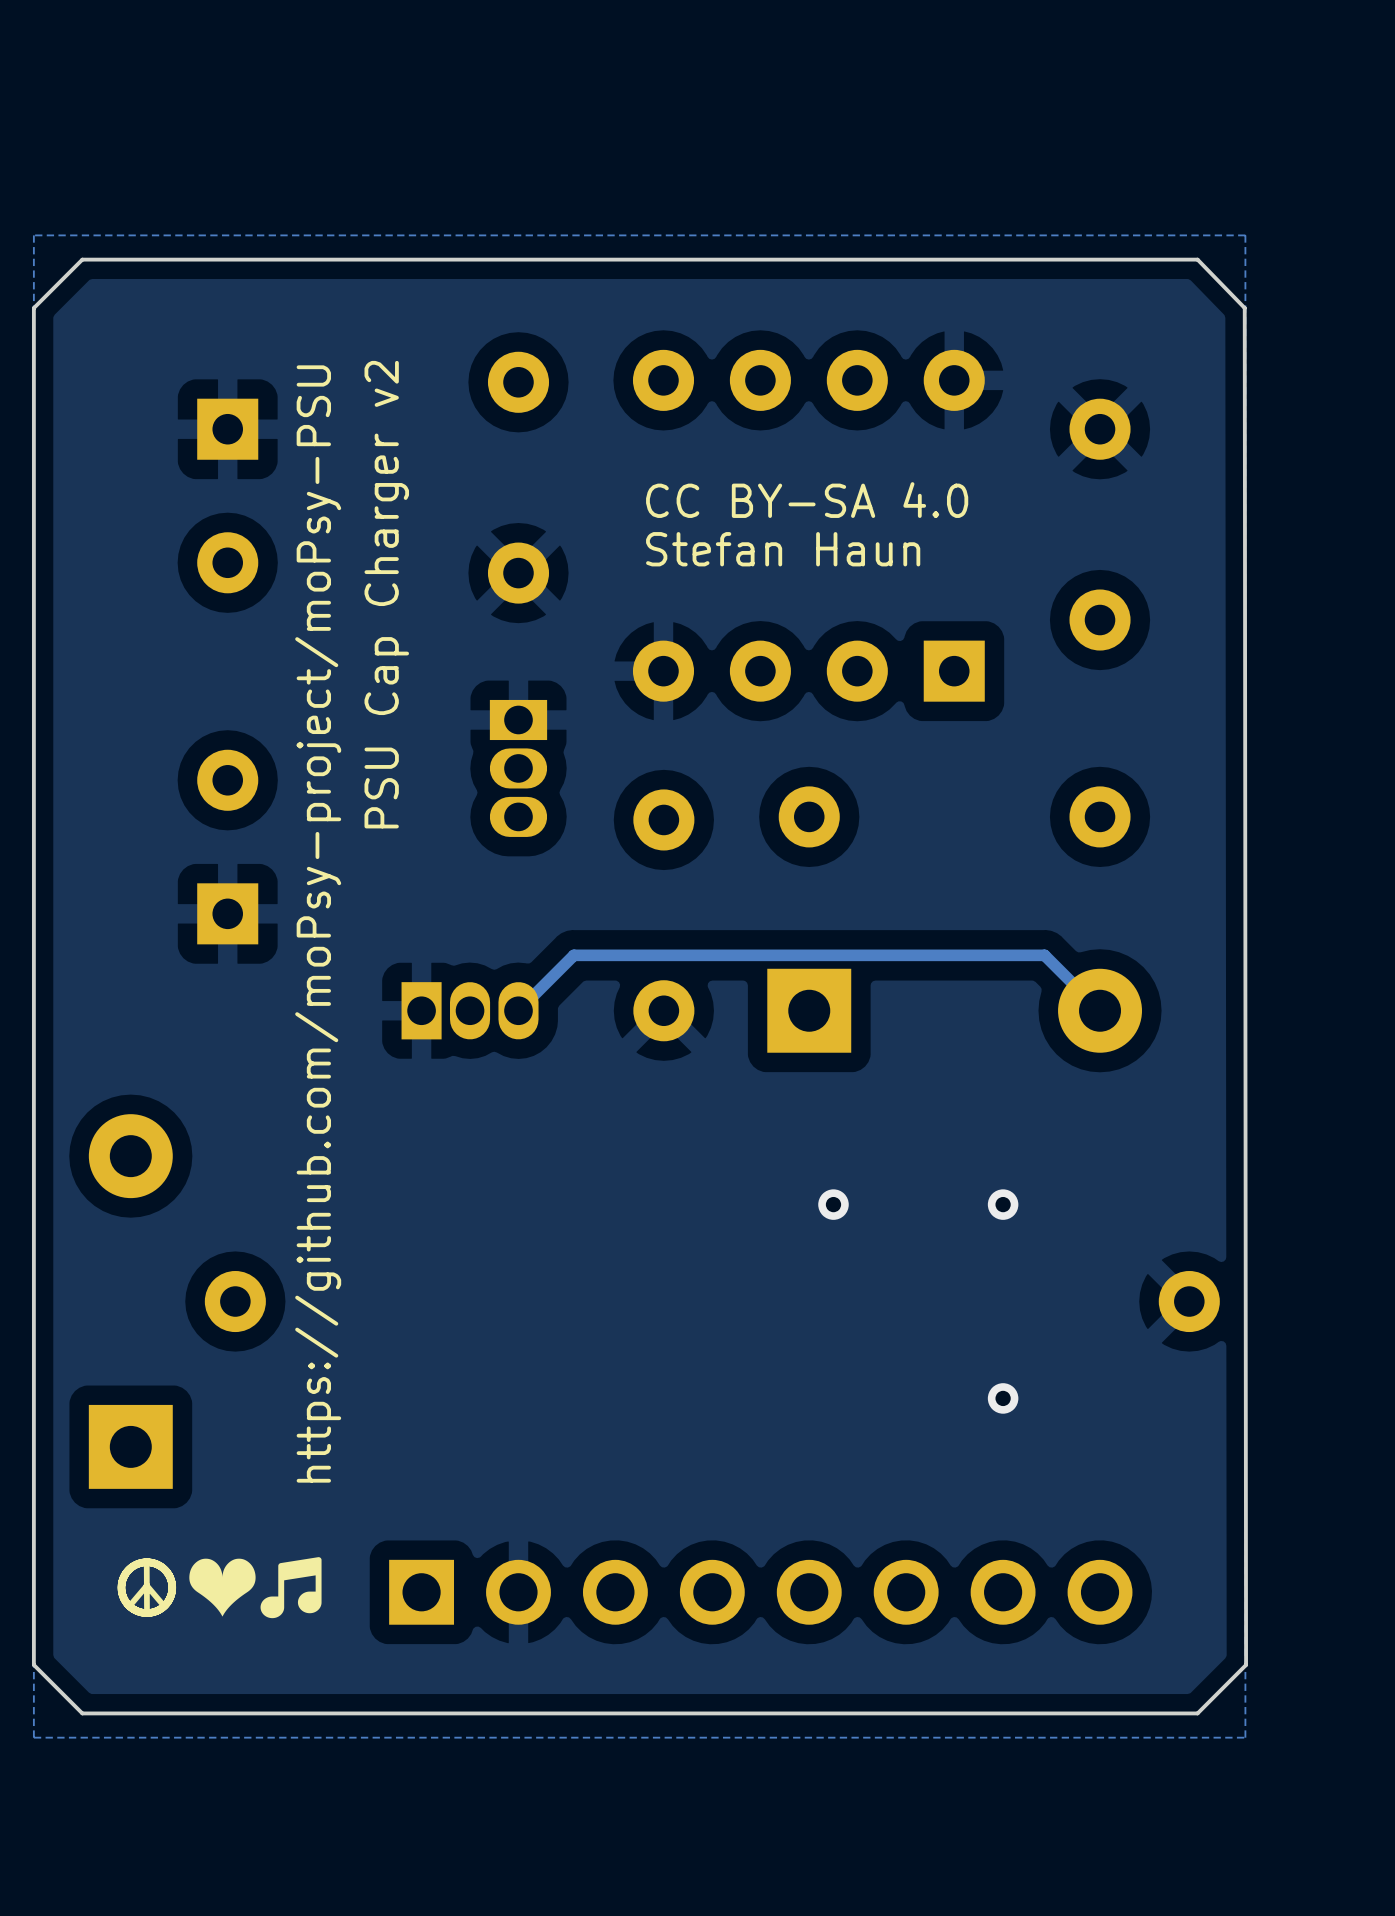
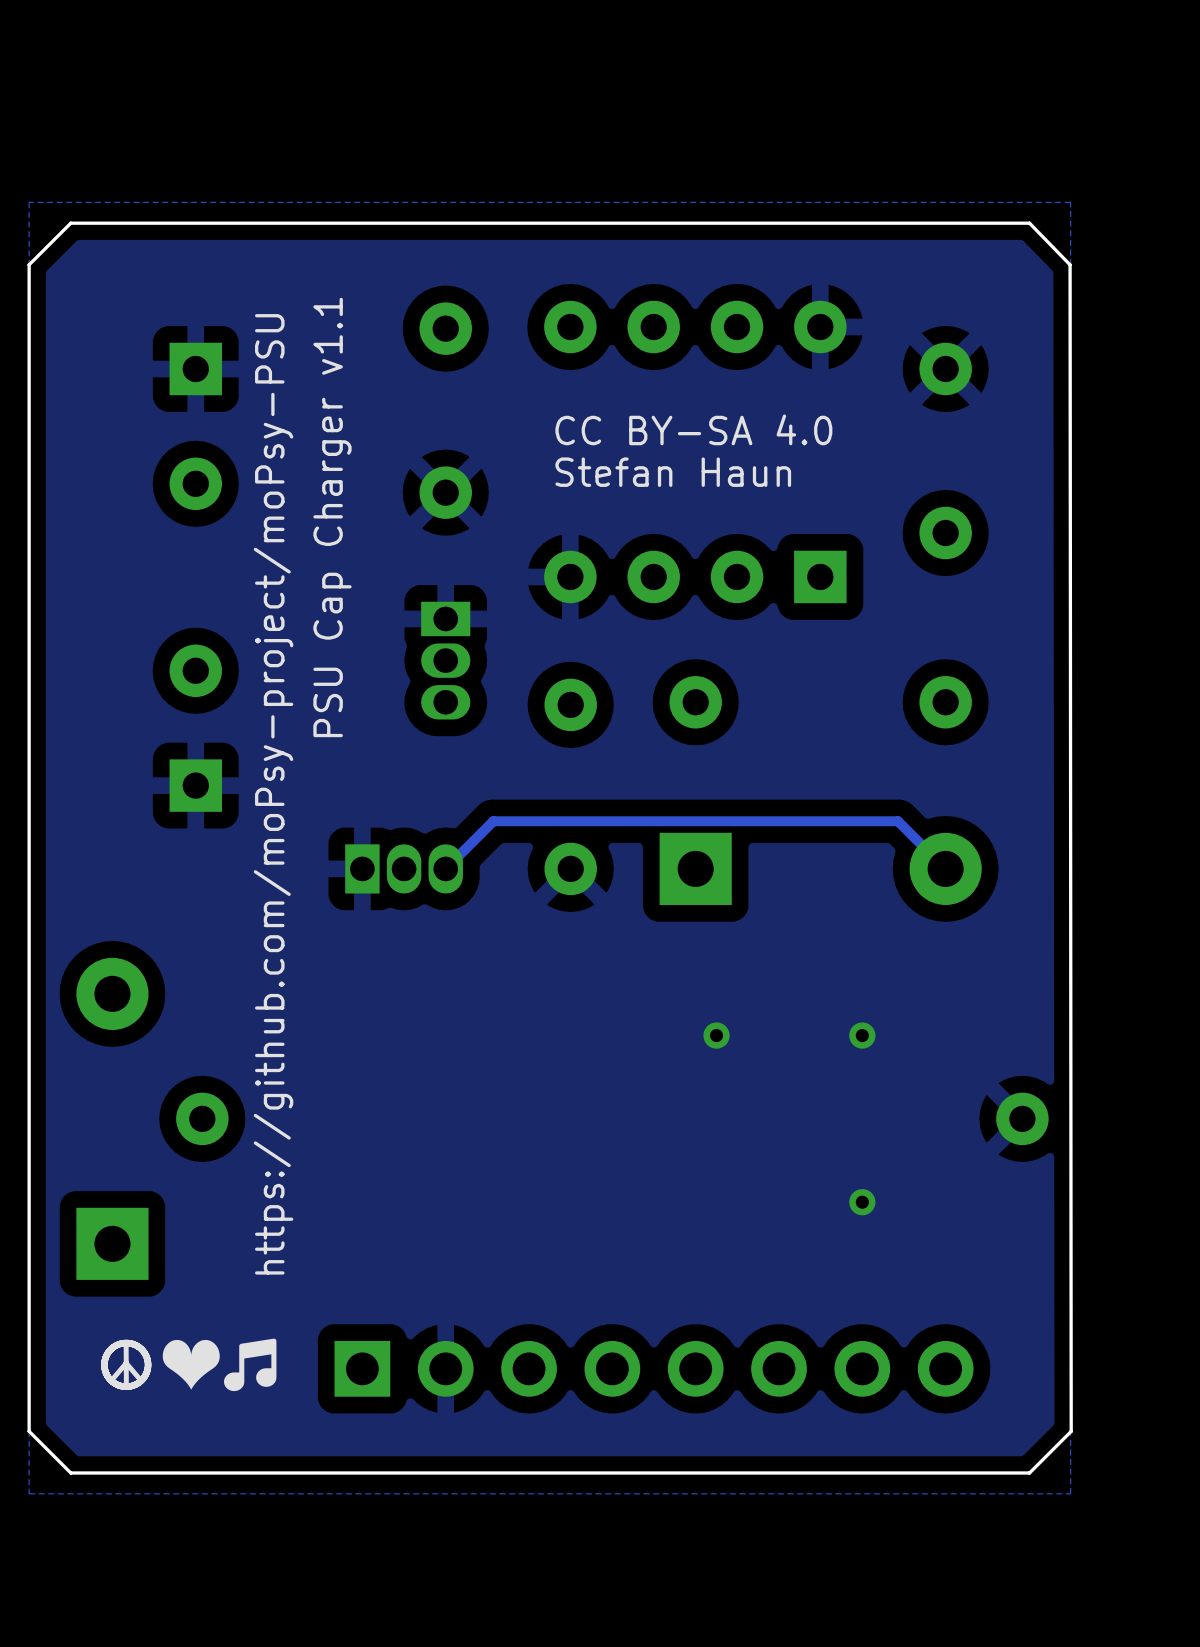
text: PSU Cap Charger v2 (386, 594) -> PSU Cap Charger v1.1 (332, 517)

